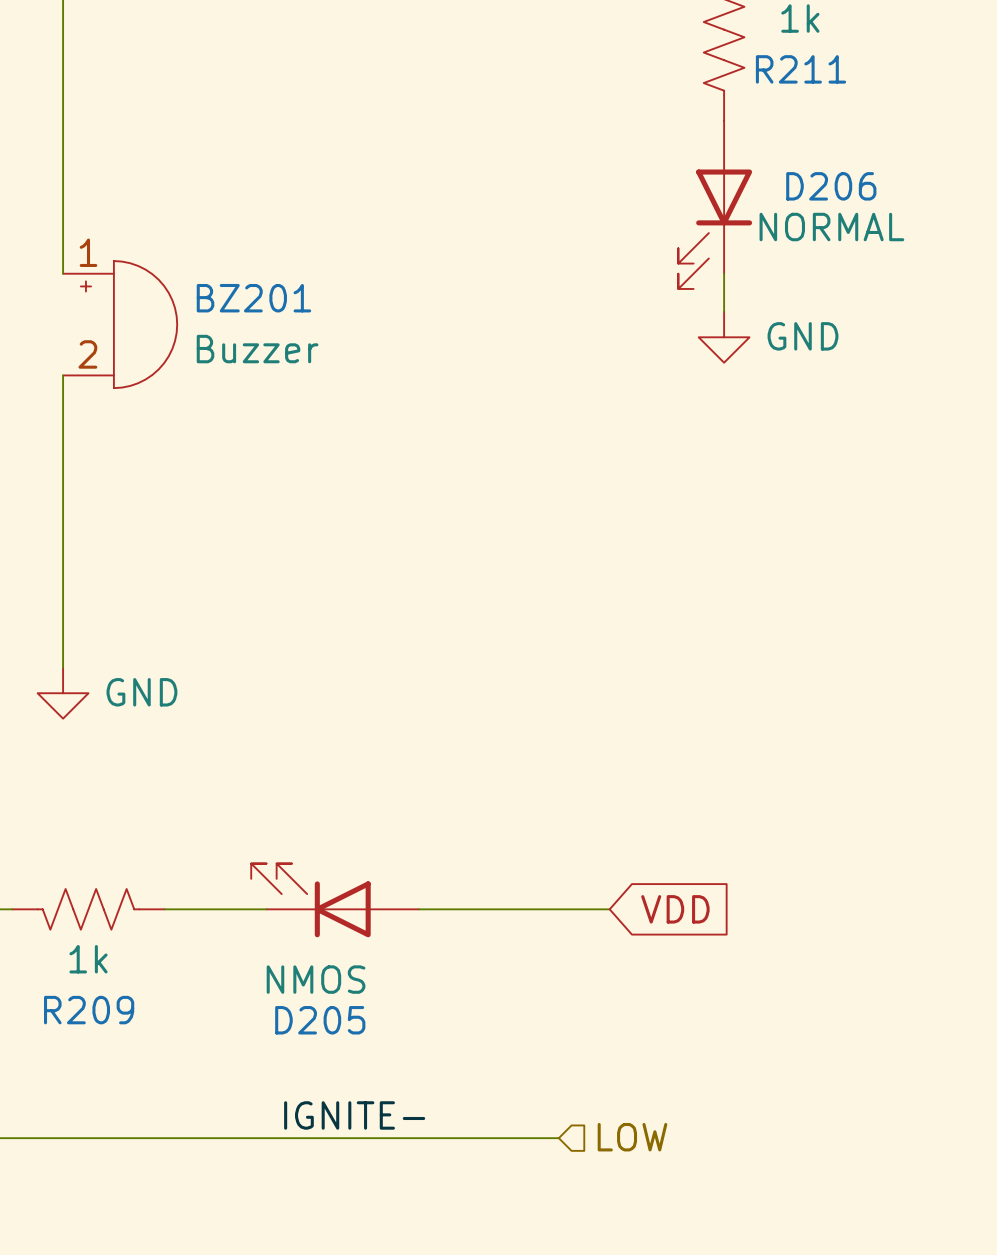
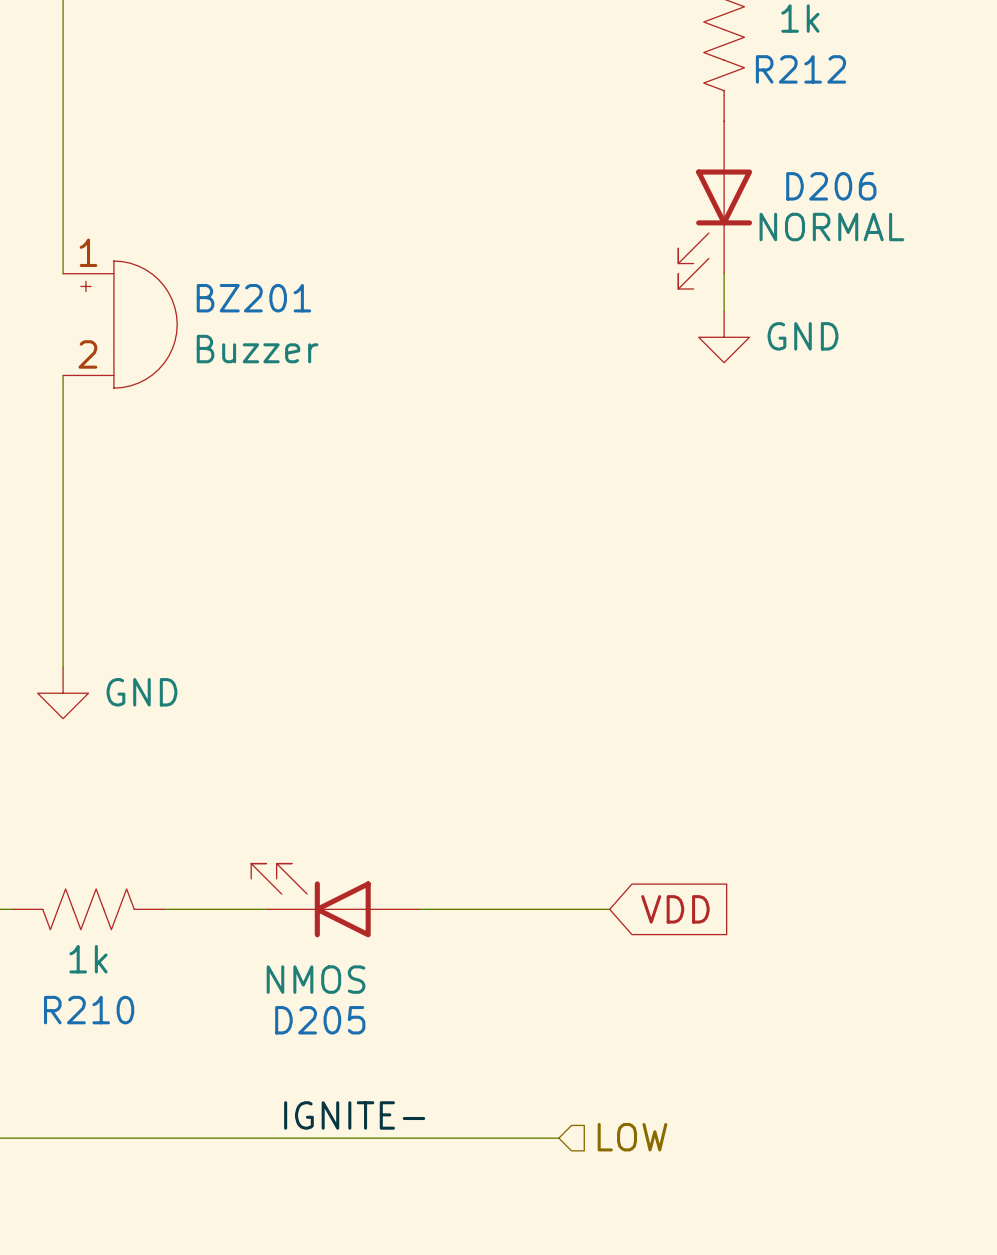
R211 name: R211 (800, 69) -> R212 (800, 69)
R209 name: R209 (89, 1010) -> R210 (89, 1010)

